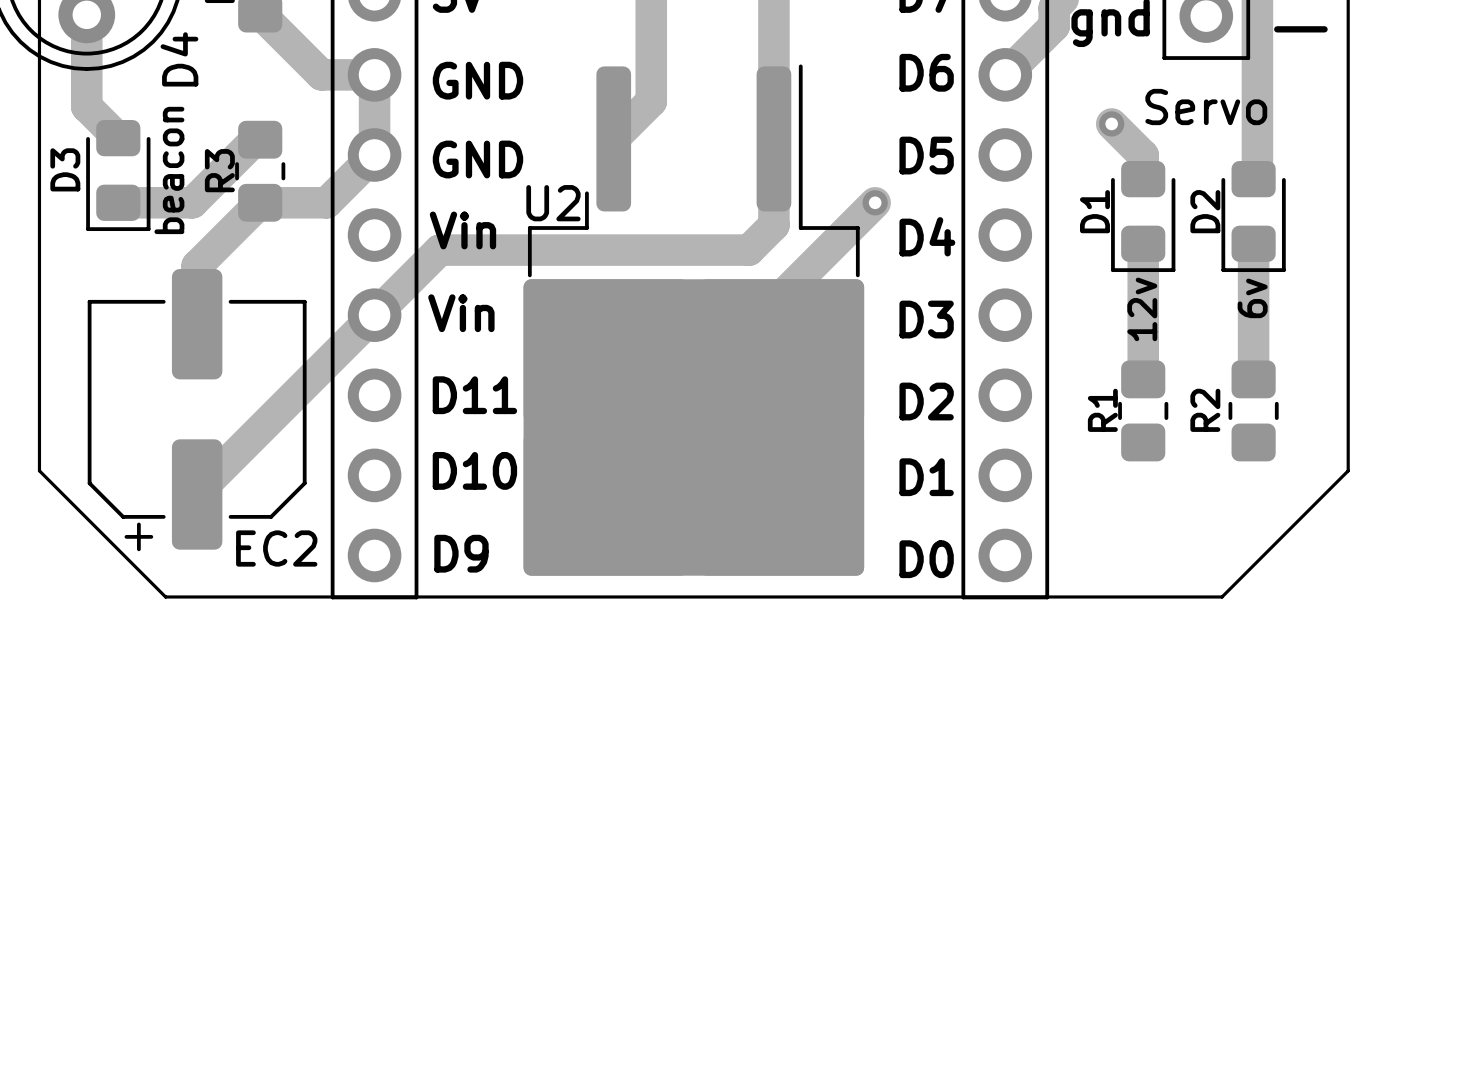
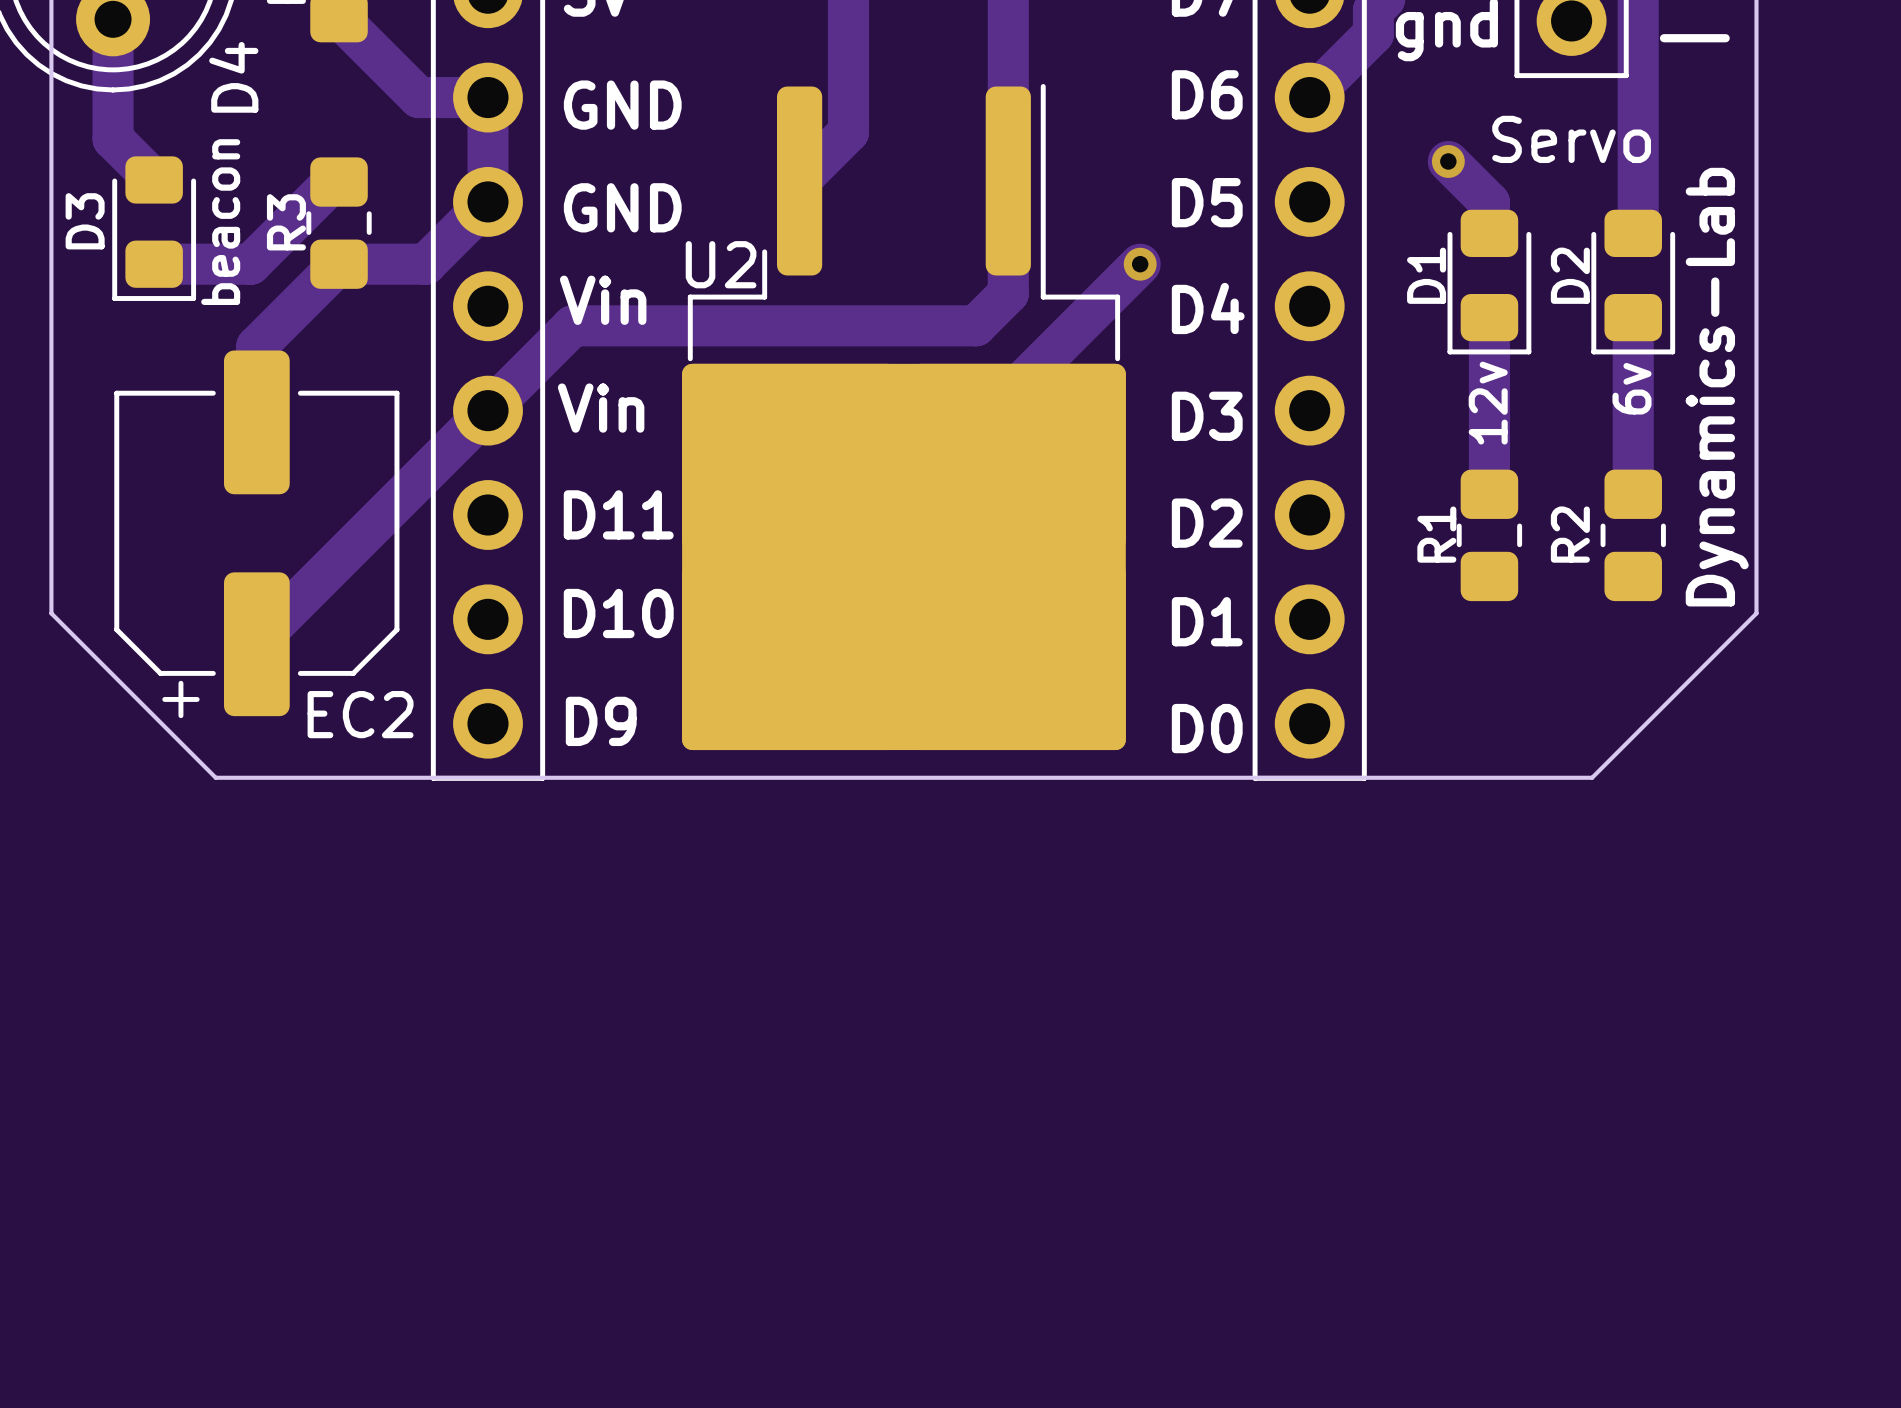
text: none -> Dynamics-Lab (1717, 387)

